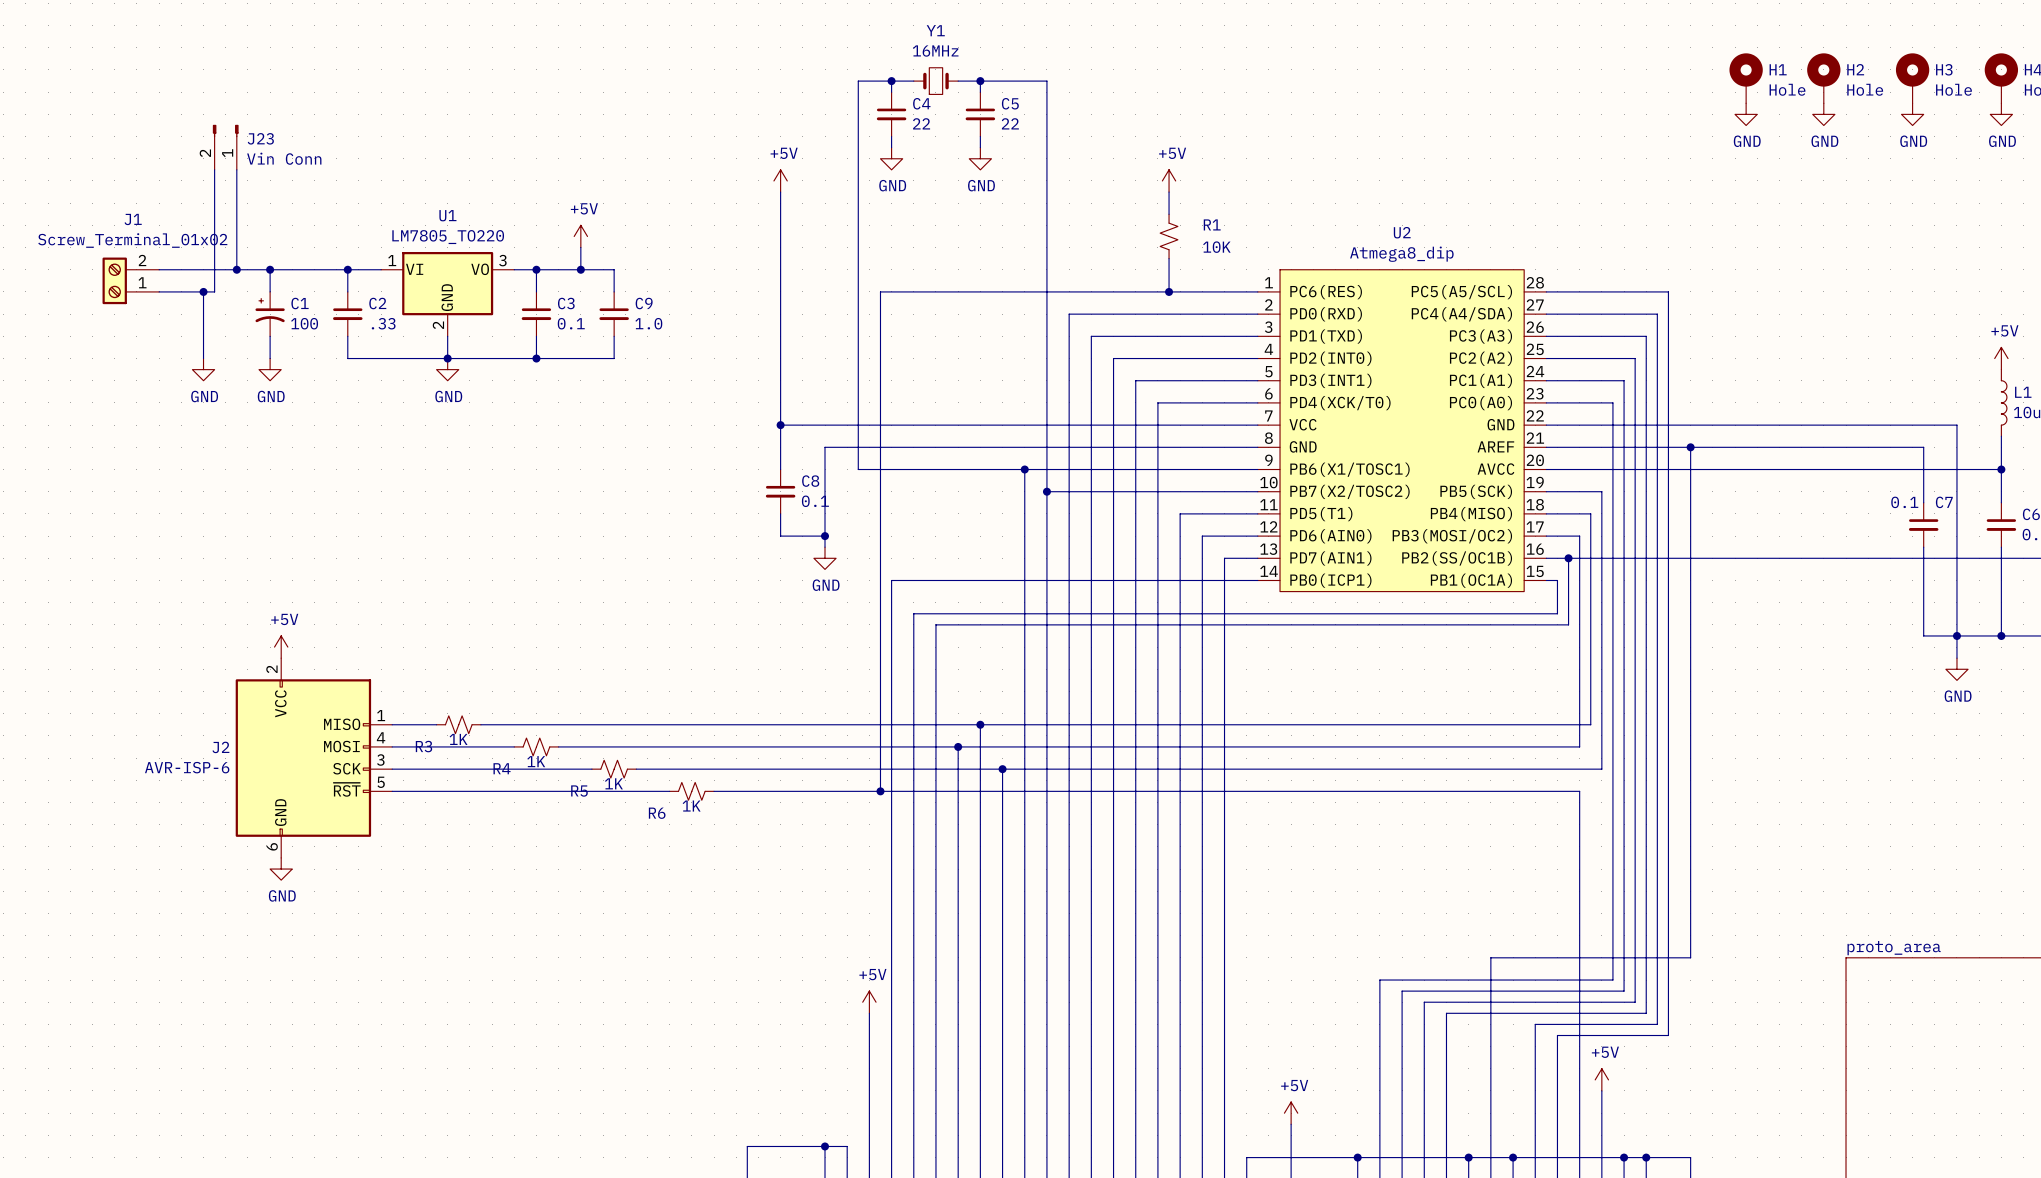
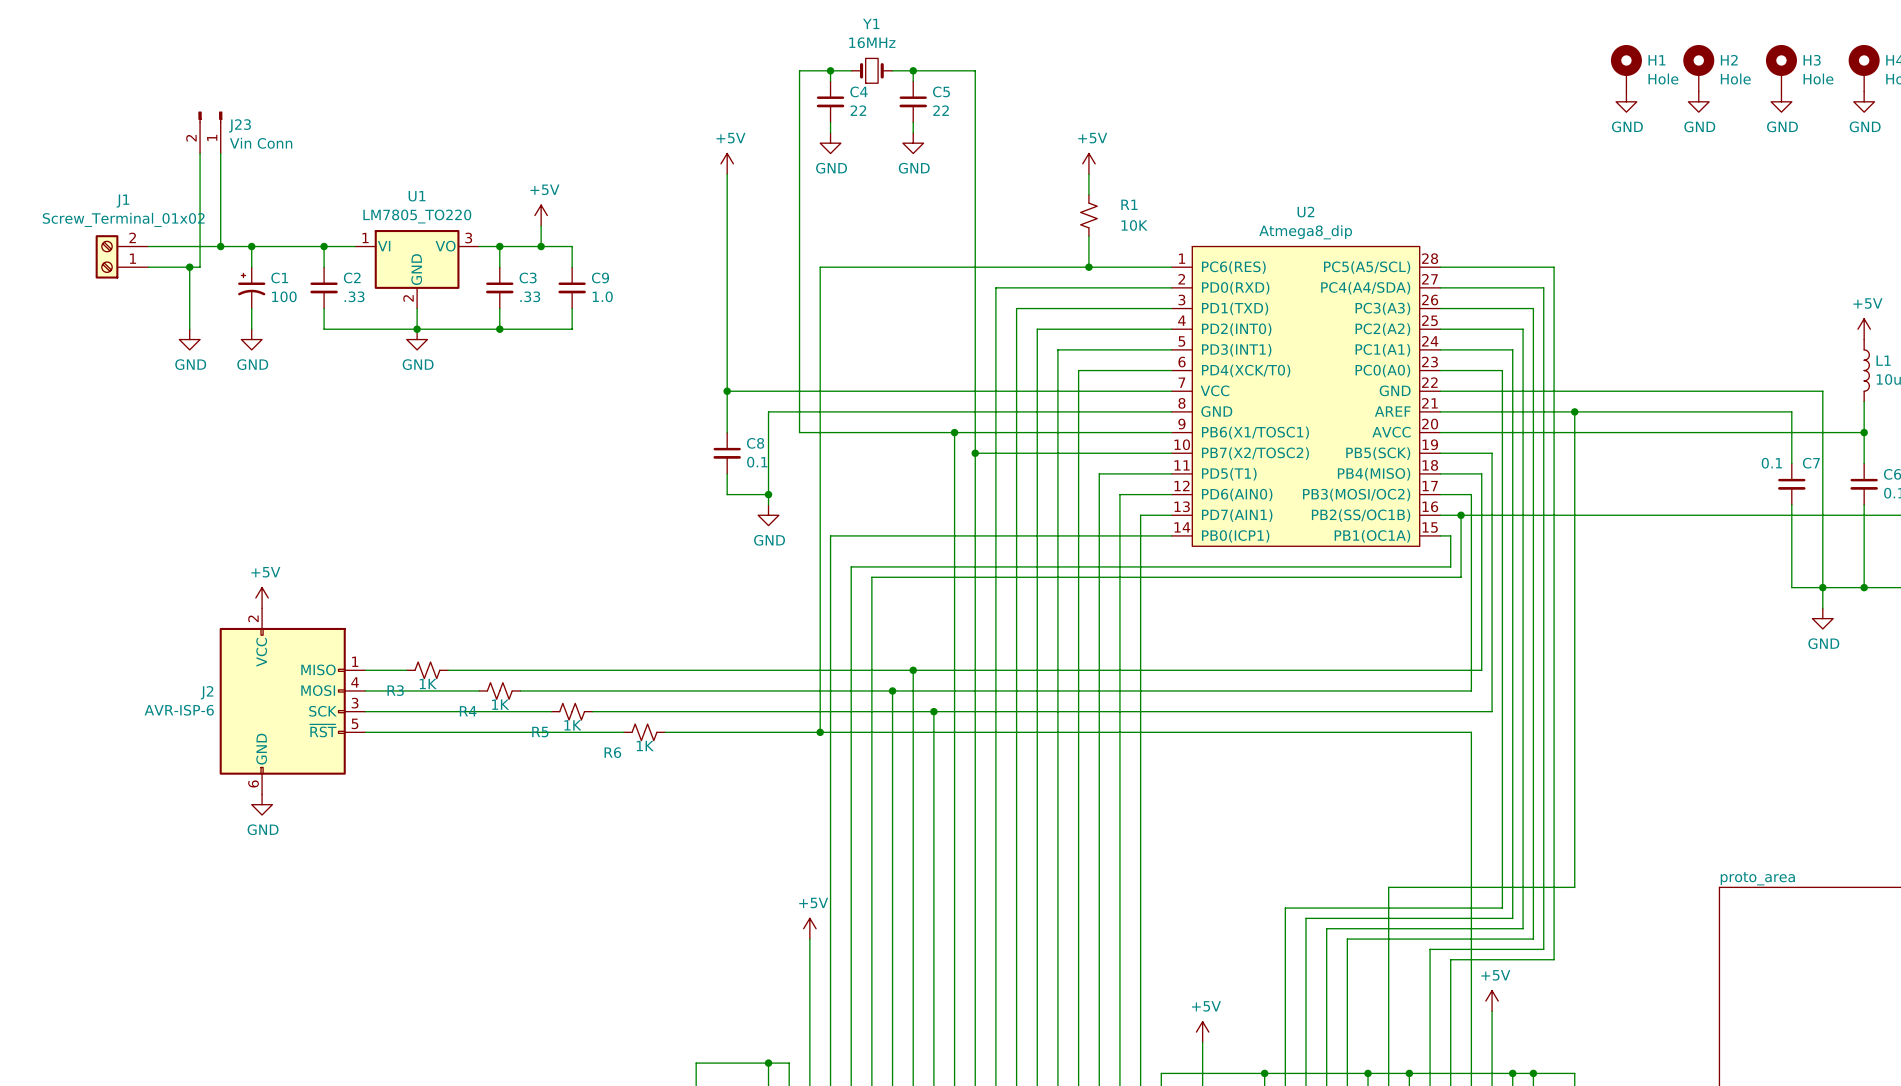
C3 value: 0.1 (571, 323) -> .33 (530, 296)

